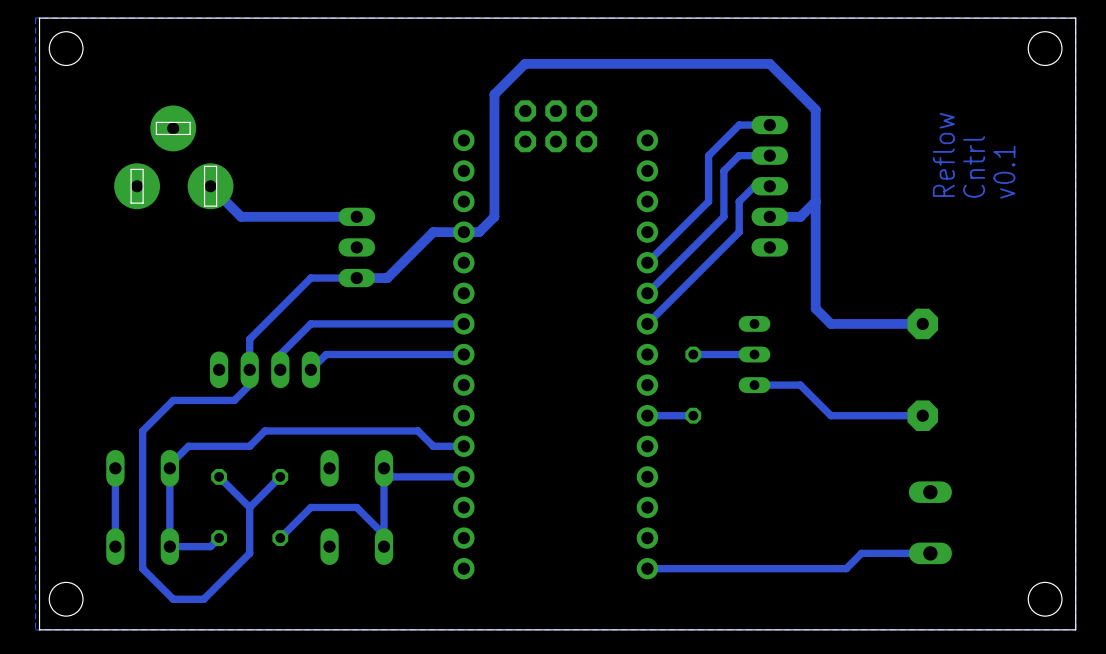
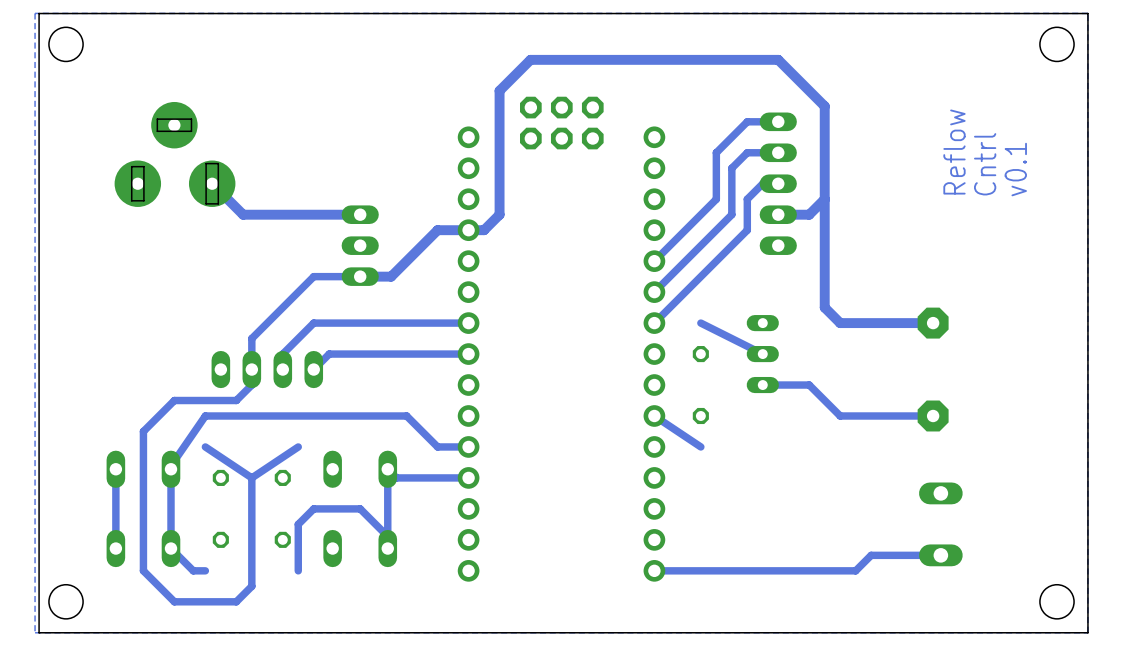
track: (754, 354) (693, 354) -> (762, 354) (700, 323)
track: (693, 415) (647, 415) -> (700, 446) (654, 415)
track: (417, 430) (265, 430) (249, 446) (188, 446) (169, 464) -> (422, 431) (406, 415) (205, 415) (170, 465)
track: none -> (205, 446) (251, 477)
track: none -> (298, 446) (251, 477)
track: none -> (251, 477) (251, 508)
track: (280, 476) (249, 507) (219, 476) -> none
track: (295, 522) (280, 538) -> (298, 524) (298, 570)
track: (219, 538) (210, 546) (169, 546) -> (205, 570) (193, 570) (170, 548)
track: (249, 553) (203, 599) -> (251, 555) (251, 586) (236, 601) (205, 601)

